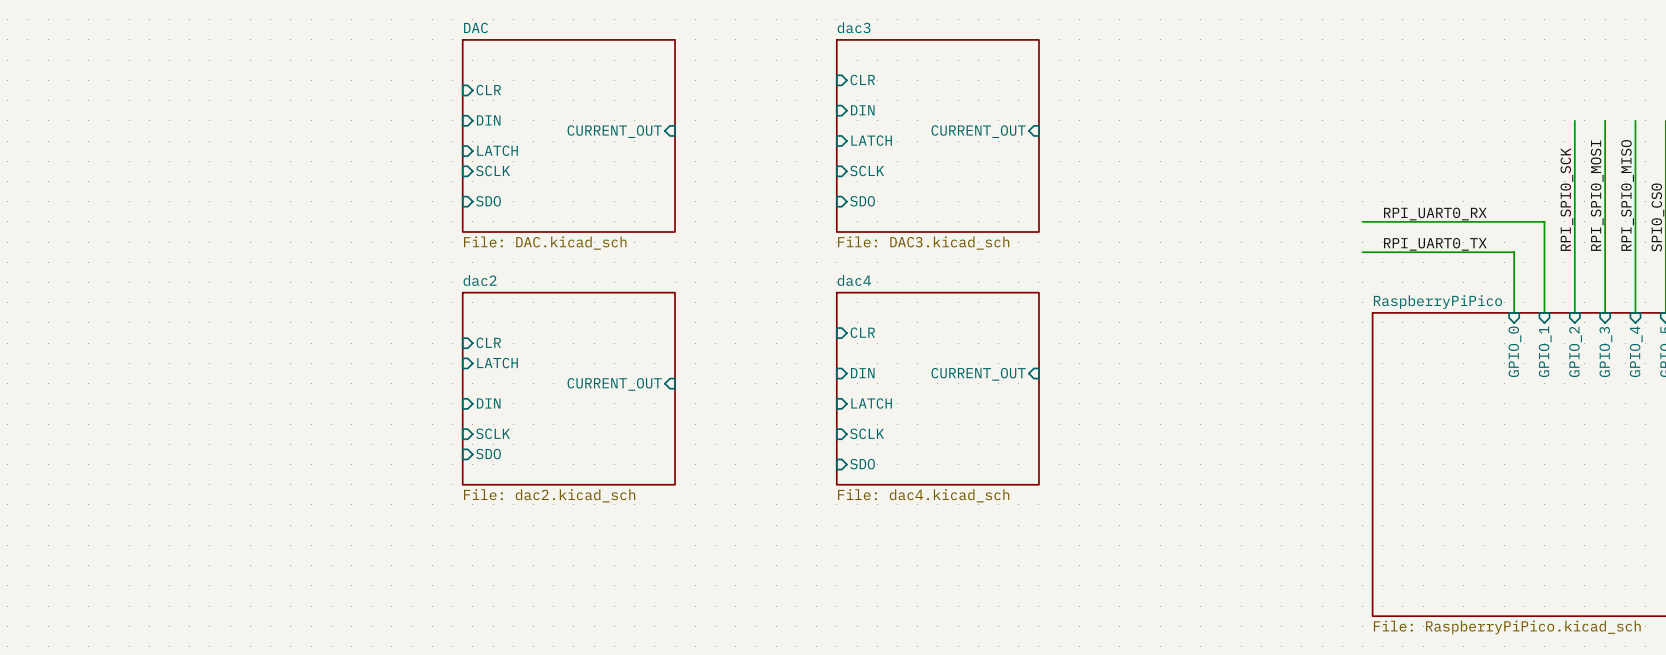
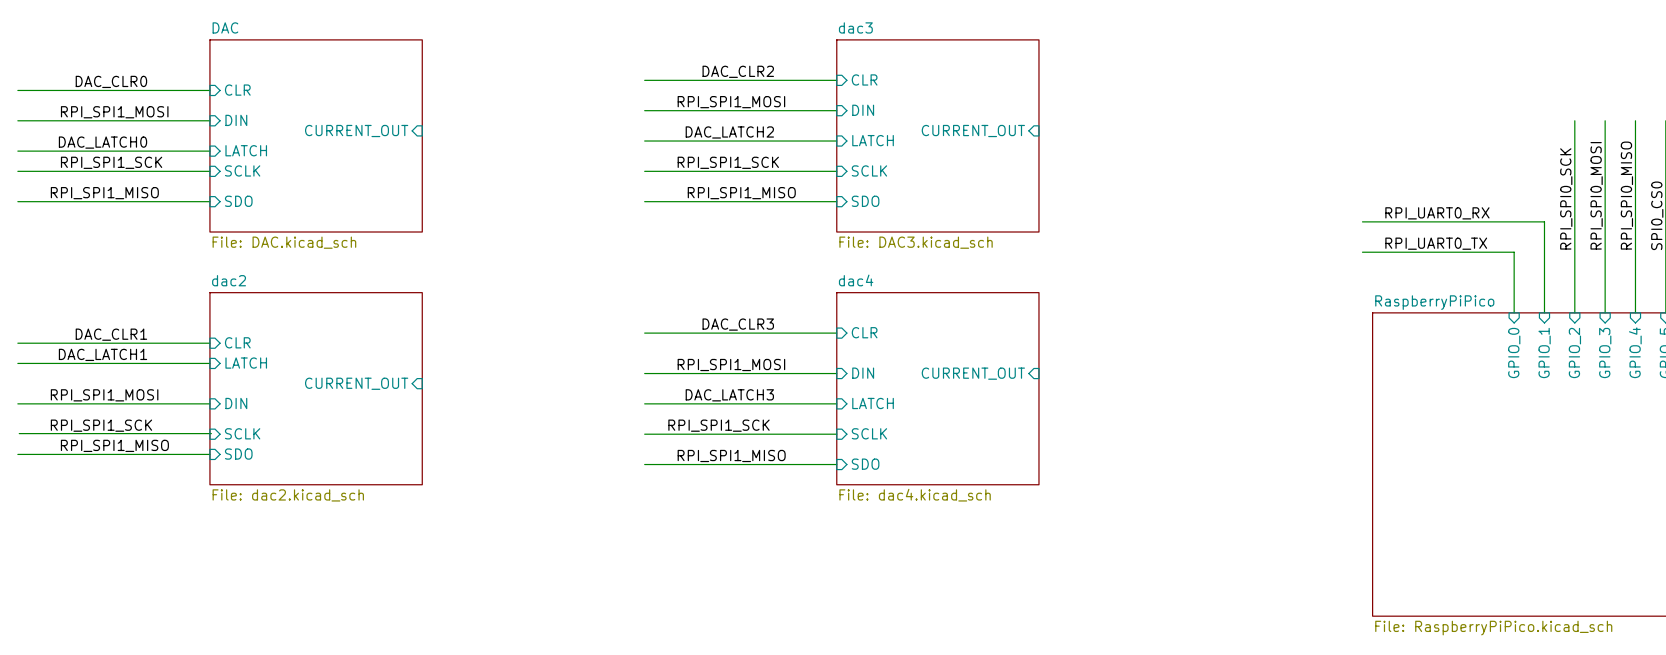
label: none -> DAC_CLR2 (738, 71)
wire: none -> (644, 80) (836, 80)
label: none -> DAC_CLR0 (111, 81)
wire: none -> (17, 90) (209, 90)
sheet pin: none -> CLR (237, 90)
sheet pin: CLR (488, 90) -> none
label: none -> RPI_SPI1_MOSI (731, 102)
wire: none -> (644, 110) (836, 110)
label: none -> RPI_SPI1_MOSI (114, 112)
wire: none -> (17, 120) (209, 120)
sheet pin: none -> DIN (236, 120)
sheet pin: DIN (488, 120) -> none
sheet pin: none -> CURRENT_OUT (356, 131)
sheet pin: CURRENT_OUT (614, 131) -> none
label: none -> DAC_LATCH2 (729, 132)
sheet DAC: none -> File: DAC.kicad_sch (316, 135)
sheet DAC: File: DAC.kicad_sch (568, 135) -> none
wire: none -> (644, 141) (836, 141)
label: none -> DAC_LATCH0 (103, 142)
sheet pin: none -> LATCH (246, 150)
sheet pin: LATCH (497, 150) -> none
wire: none -> (17, 151) (209, 151)
label: none -> RPI_SPI1_SCK (111, 162)
label: none -> RPI_SPI1_SCK (728, 162)
sheet pin: none -> SCLK (242, 170)
sheet pin: SCLK (493, 170) -> none
wire: none -> (17, 171) (209, 171)
wire: none -> (644, 171) (836, 171)
label: none -> RPI_SPI1_MISO (104, 193)
label: none -> RPI_SPI1_MISO (741, 193)
wire: none -> (17, 201) (209, 201)
sheet pin: none -> SDO (238, 201)
sheet pin: SDO (488, 201) -> none
wire: none -> (644, 201) (836, 201)
label: none -> DAC_CLR3 (738, 324)
wire: none -> (644, 333) (836, 333)
label: none -> DAC_CLR1 (111, 334)
sheet pin: none -> CLR (237, 342)
sheet pin: CLR (488, 342) -> none
wire: none -> (17, 343) (209, 343)
label: none -> DAC_LATCH1 (103, 354)
wire: none -> (17, 363) (209, 363)
sheet pin: none -> LATCH (246, 363)
sheet pin: LATCH (497, 363) -> none
label: none -> RPI_SPI1_MOSI (731, 365)
wire: none -> (644, 373) (836, 373)
sheet pin: none -> CURRENT_OUT (356, 383)
sheet pin: CURRENT_OUT (614, 384) -> none
sheet dac2 position: (568, 388) -> (316, 388)
label: none -> RPI_SPI1_MOSI (104, 395)
label: none -> DAC_LATCH3 (729, 395)
wire: none -> (17, 403) (209, 403)
sheet pin: none -> DIN (236, 403)
sheet pin: DIN (488, 403) -> none
wire: none -> (644, 403) (836, 403)
label: none -> RPI_SPI1_SCK (101, 425)
label: none -> RPI_SPI1_SCK (719, 425)
wire: none -> (19, 433) (211, 433)
sheet pin: none -> SCLK (242, 433)
sheet pin: SCLK (493, 433) -> none
wire: none -> (644, 434) (836, 434)
label: none -> RPI_SPI1_MISO (114, 445)
wire: none -> (17, 454) (209, 454)
sheet pin: none -> SDO (238, 454)
sheet pin: SDO (488, 454) -> none
label: none -> RPI_SPI1_MISO (731, 455)
wire: none -> (644, 464) (836, 464)

